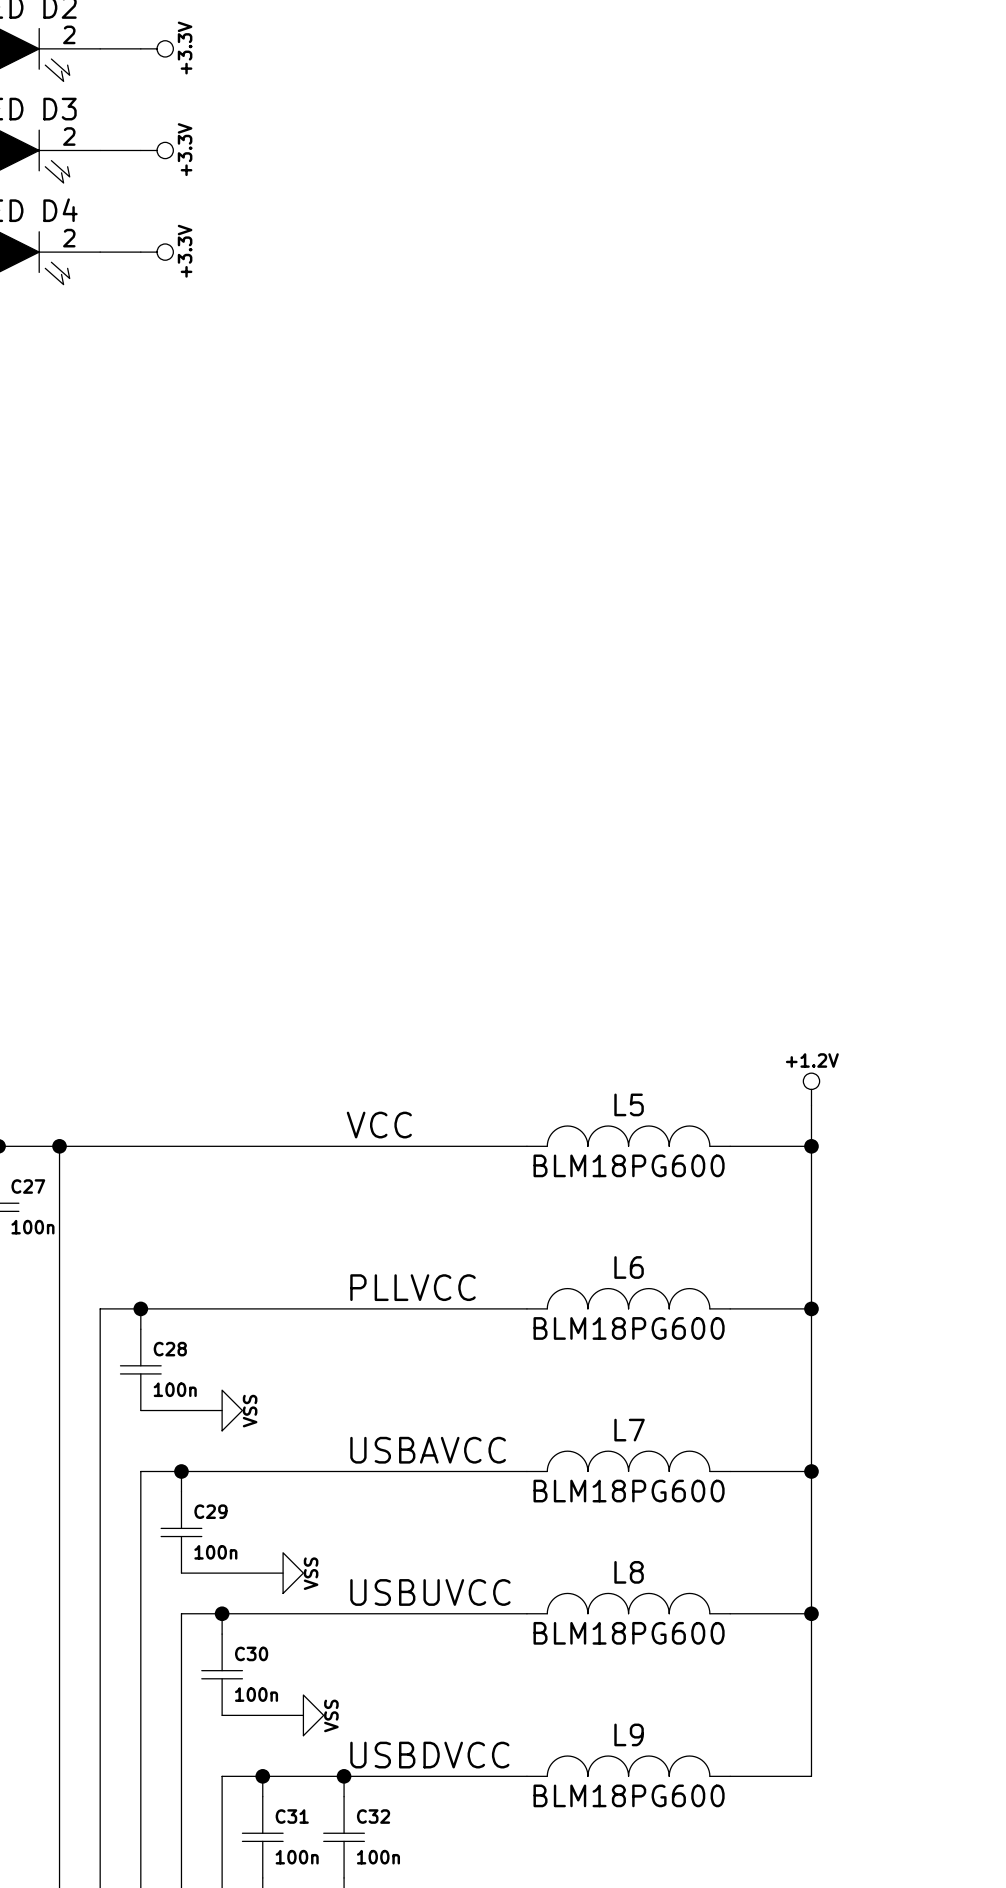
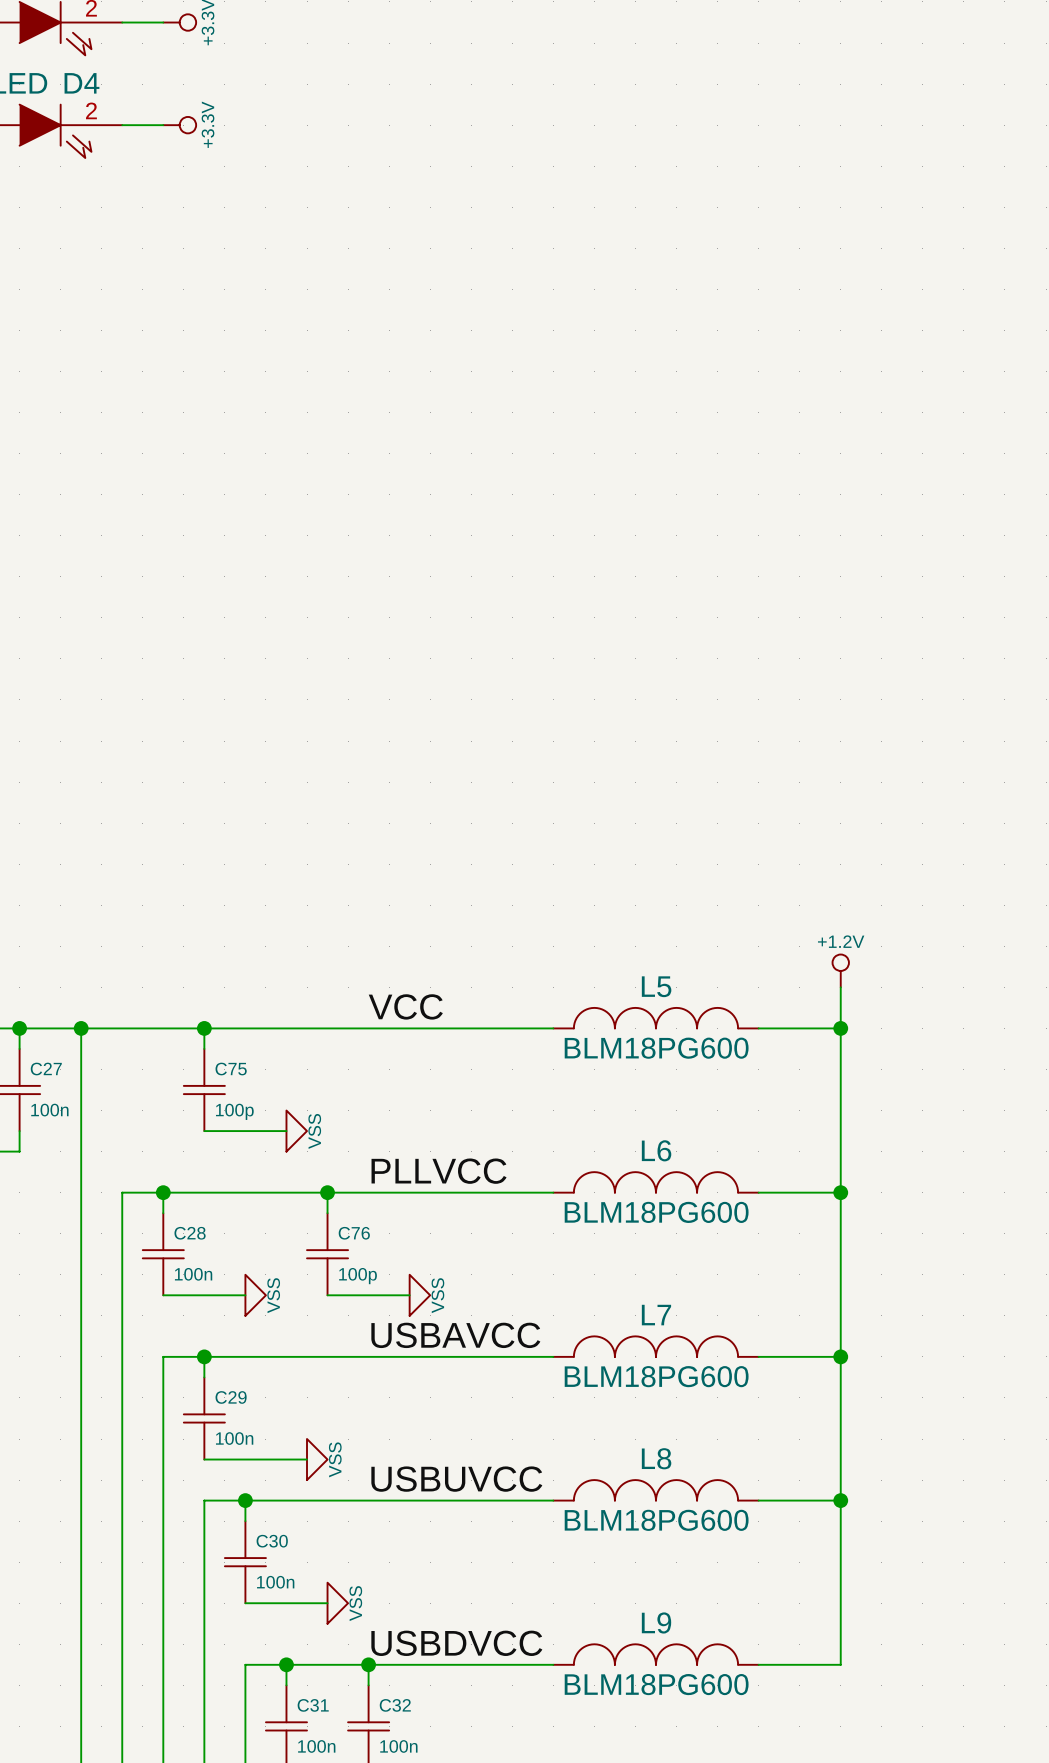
wire: none -> (204, 1028) (204, 1048)
junction: none -> (204, 1028)
C75: none -> 100p (204, 1090)
wire: none -> (204, 1131) (286, 1131)
power symbol: none -> VSS (296, 1131)
wire: none -> (327, 1192) (327, 1213)
junction: none -> (327, 1192)
C76: none -> 100p (327, 1254)
wire: none -> (327, 1295) (409, 1295)
power symbol: none -> VSS (419, 1295)

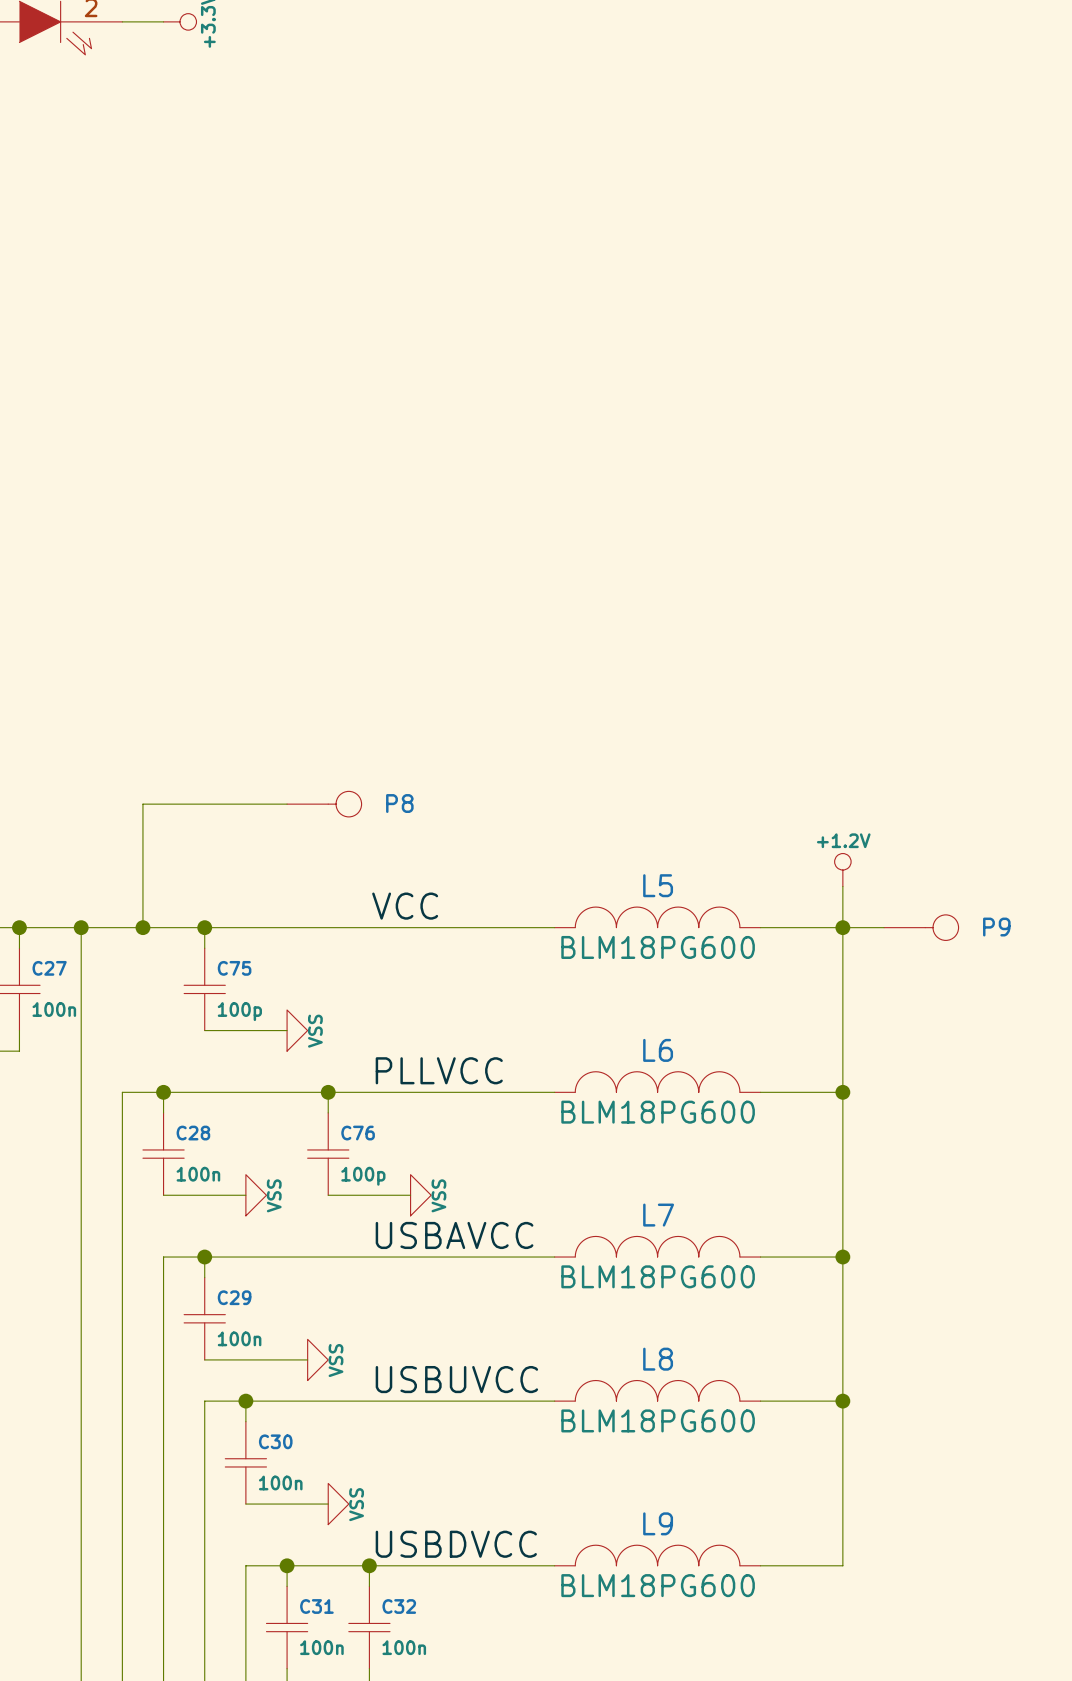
wire: none -> (287, 804) (142, 804) (142, 927)
P8: none -> (324, 804)
junction: none -> (142, 927)
wire: none -> (842, 927) (884, 927)
P9: none -> (921, 927)

